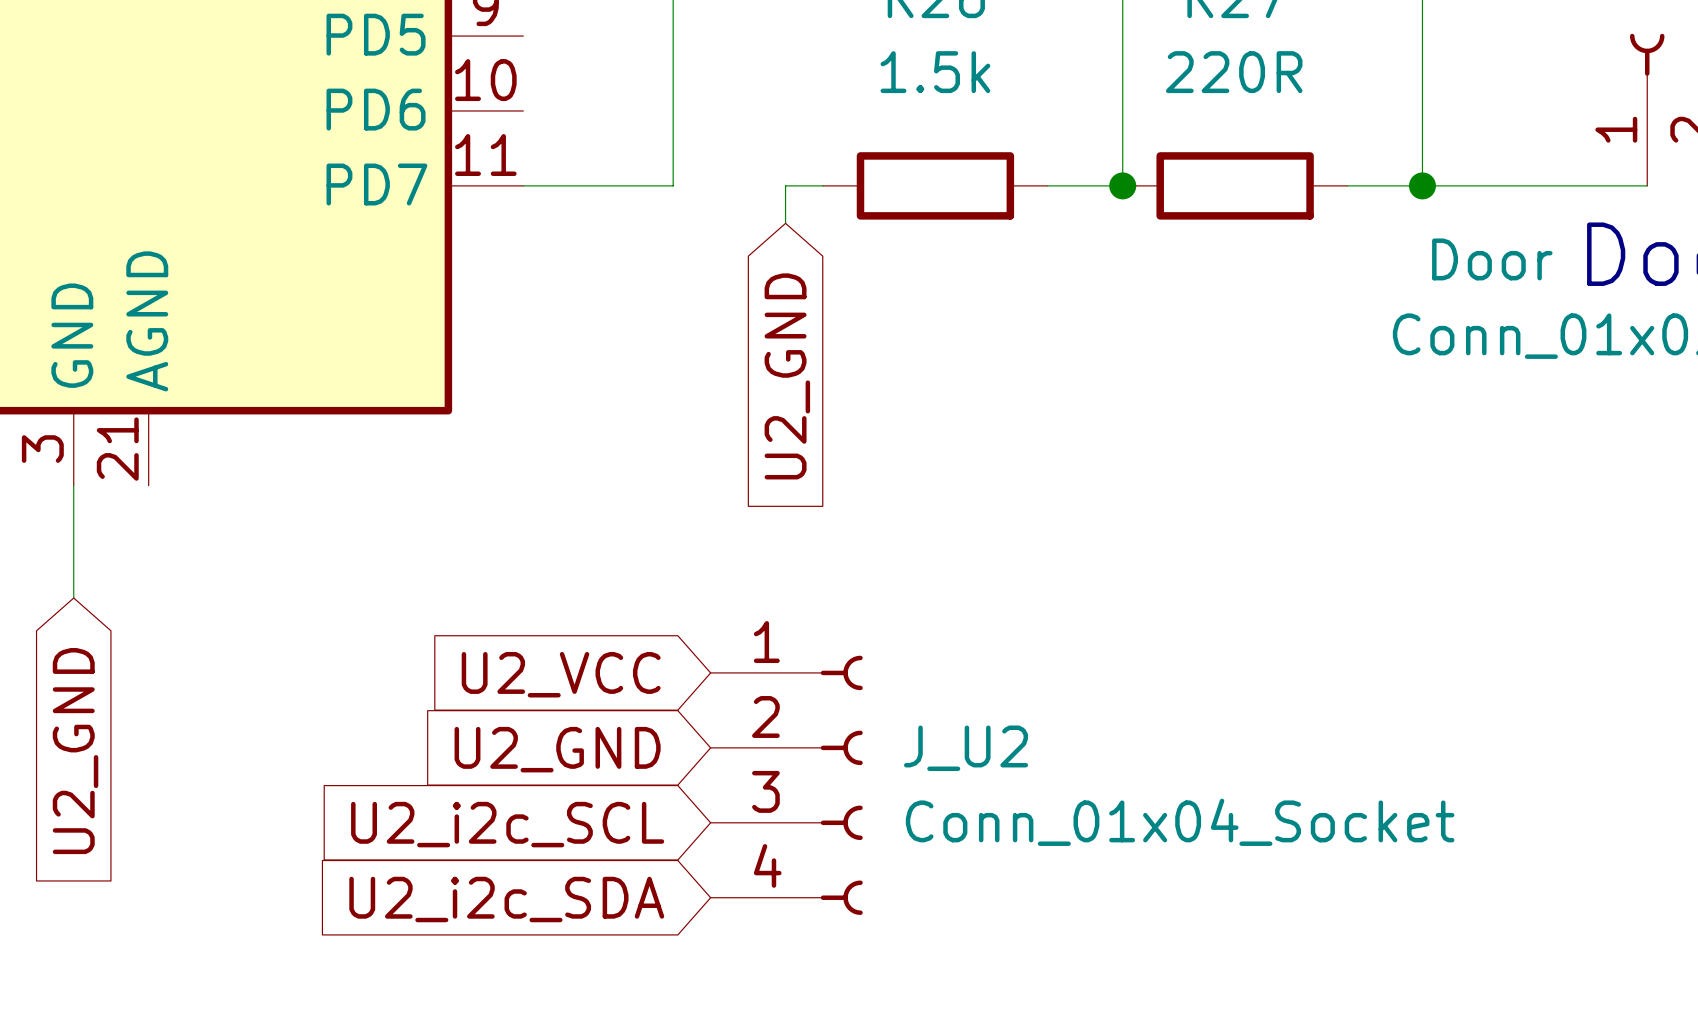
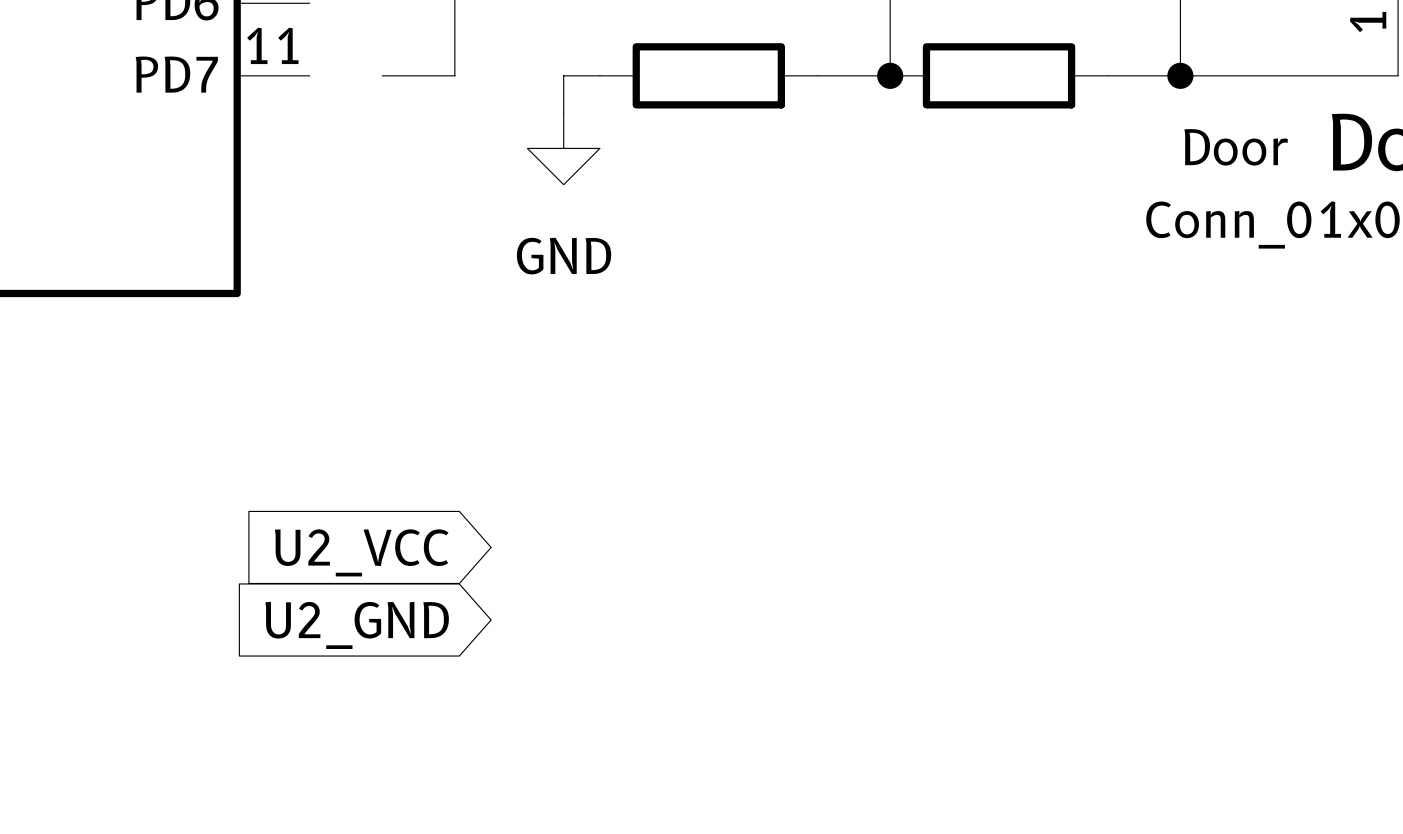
wire: (523, 185) (598, 185) -> none
power symbol: none -> GND (563, 148)
global label: U2_GND (787, 376) -> none
J_U2: Conn_01x04_Socket (786, 785) -> none
global label: U2_i2c_SCL (507, 824) -> none
global label: U2_i2c_SDA (506, 899) -> none

